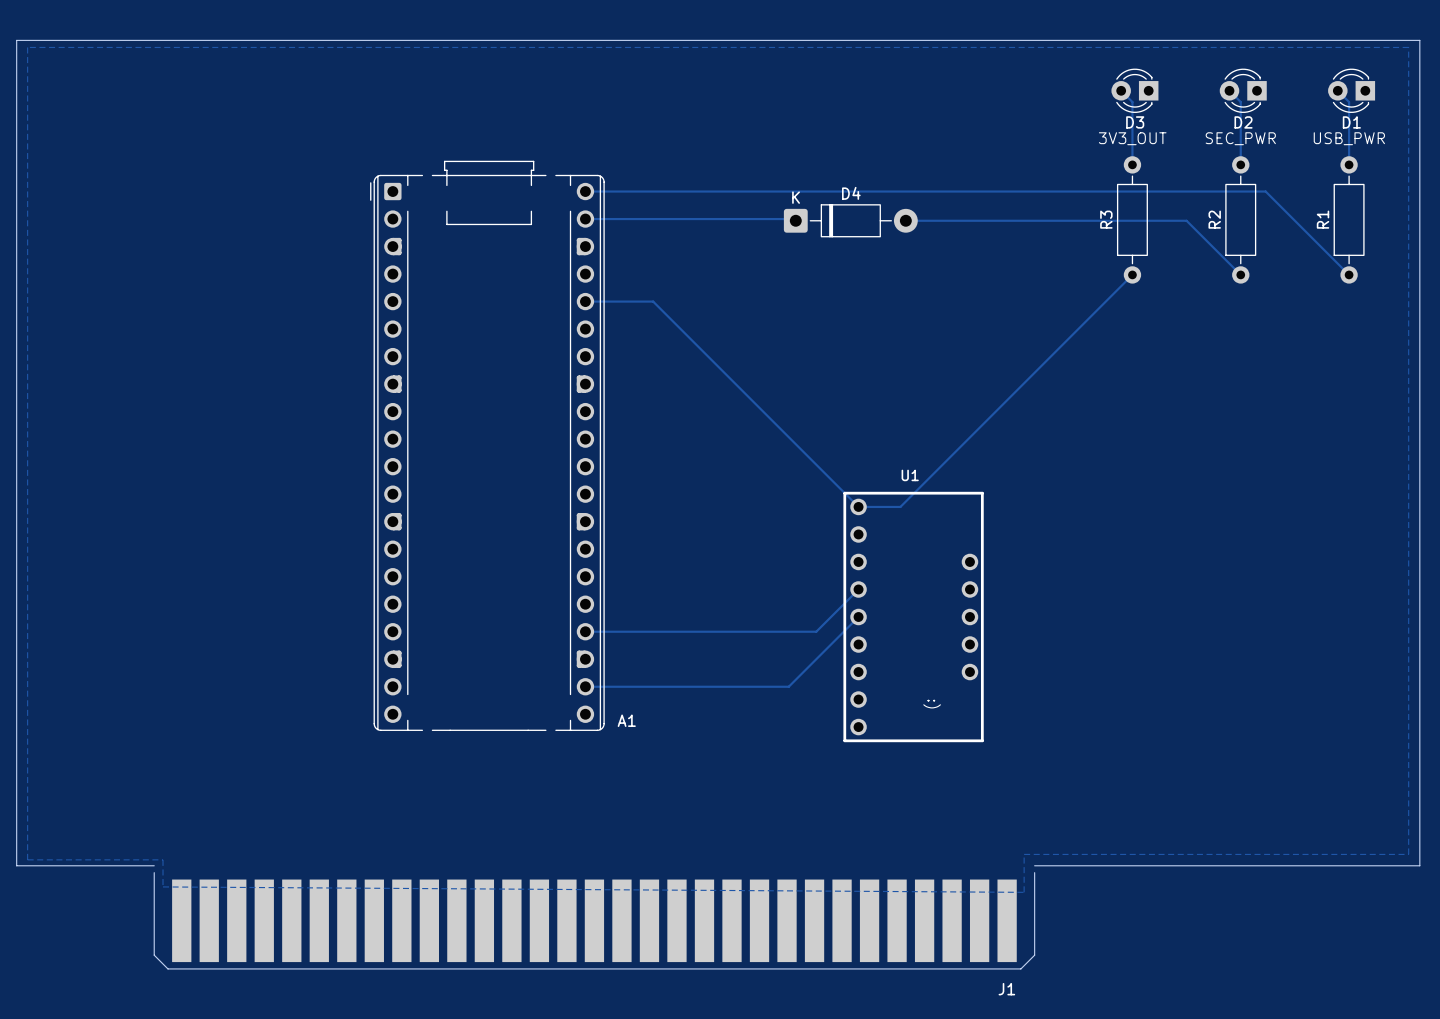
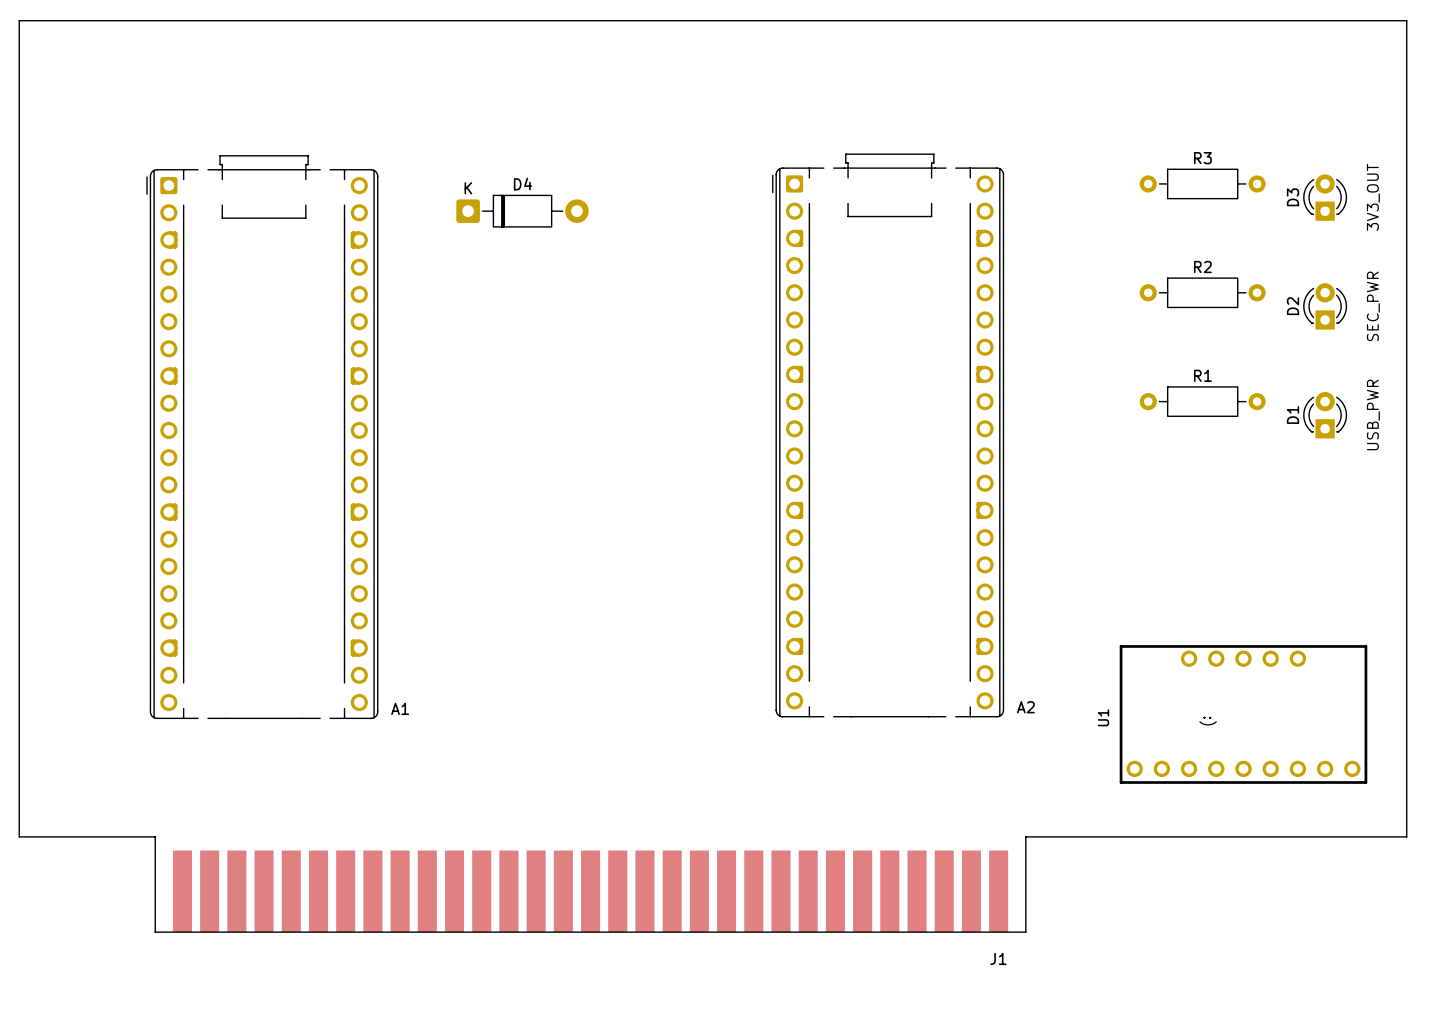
zone outline: (27, 47) (27, 859) (163, 859) (163, 886) (1024, 892) (1024, 854) (1408, 854) (1408, 47) (27, 47) -> none
track: (1121, 90) (1132, 102) (1132, 164) -> none
D3 rotation: 0° (1134, 90) -> 90° clockwise (1325, 197)
D3 position: (1134, 90) -> (1325, 197)
track: (1229, 90) (1240, 102) (1240, 164) -> none
D2 rotation: 0° (1243, 90) -> 90° clockwise (1325, 306)
D2 position: (1243, 90) -> (1325, 306)
track: (1337, 90) (1349, 102) (1349, 164) -> none
D1 rotation: 0° (1351, 90) -> 90° clockwise (1325, 415)
D1 position: (1351, 90) -> (1325, 415)
text rotation: 0° (1132, 138) -> 90° counterclockwise (1373, 197)
text position: 3V3_OUT (1132, 138) -> 3V3_OUT (1373, 197)
text rotation: 0° (1240, 138) -> 90° counterclockwise (1373, 306)
text position: SEC_PWR (1240, 138) -> SEC_PWR (1373, 306)
text: USB_PWR (1349, 138) -> none
track: (585, 191) (1265, 191) (1349, 274) -> none
track: (585, 219) (794, 219) (795, 220) -> none
R3 rotation: 0° (1132, 219) -> 90° clockwise (1202, 183)
R3 position: (1132, 219) -> (1202, 183)
R2 rotation: 0° (1240, 219) -> 90° clockwise (1202, 292)
R2 position: (1240, 219) -> (1202, 292)
R1 rotation: 0° (1349, 219) -> 90° clockwise (1202, 401)
R1 position: (1349, 219) -> (1202, 401)
D4 position: (850, 220) -> (522, 211)
track: (905, 220) (1186, 220) (1240, 274) -> none
track: (1132, 274) (900, 506) (858, 506) (653, 301) (585, 301) -> none
text: none -> USB_PWR (1373, 414)
A1 position: (487, 445) -> (262, 437)
A2: none -> (888, 435)
track: (858, 589) (816, 631) (585, 631) -> none
track: (858, 617) (788, 686) (585, 686) -> none
U1 rotation: 0° (913, 617) -> 90° counterclockwise (1243, 714)
U1 position: (913, 617) -> (1243, 714)
text: :) (932, 704) -> none
text: none -> :) (1208, 721)
J1 footprint: [153, 872, 1035, 970] -> [154, 836, 1027, 933]

